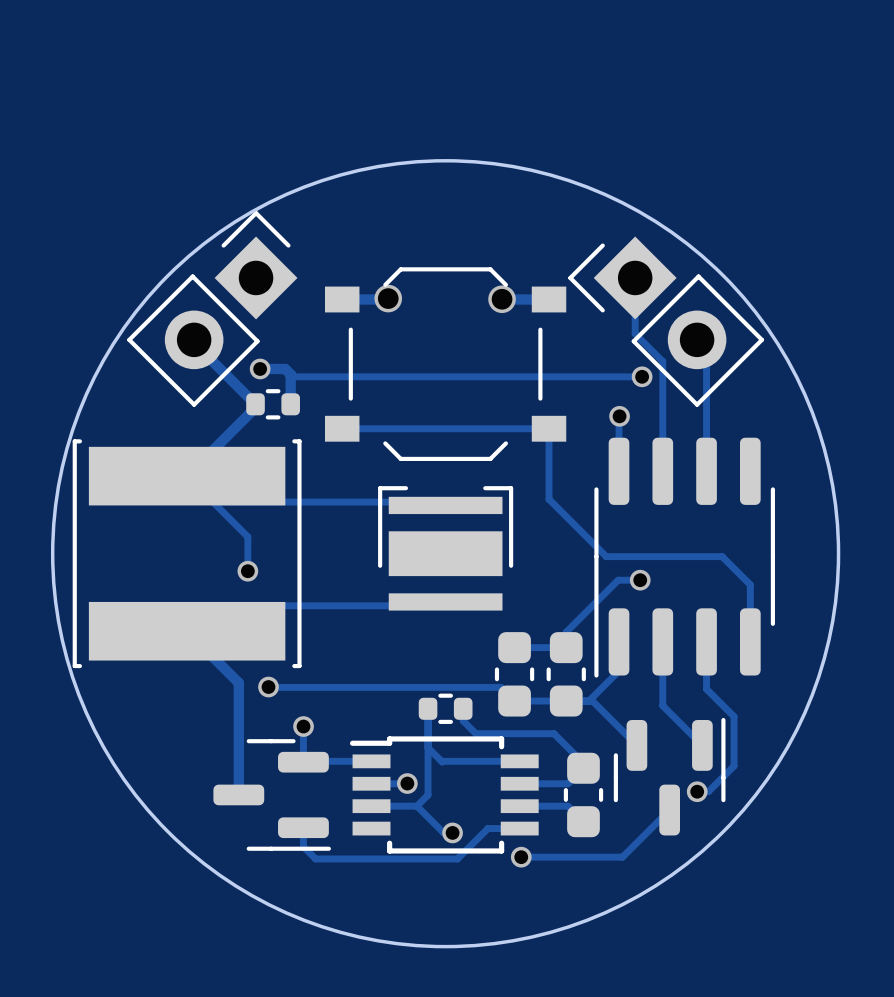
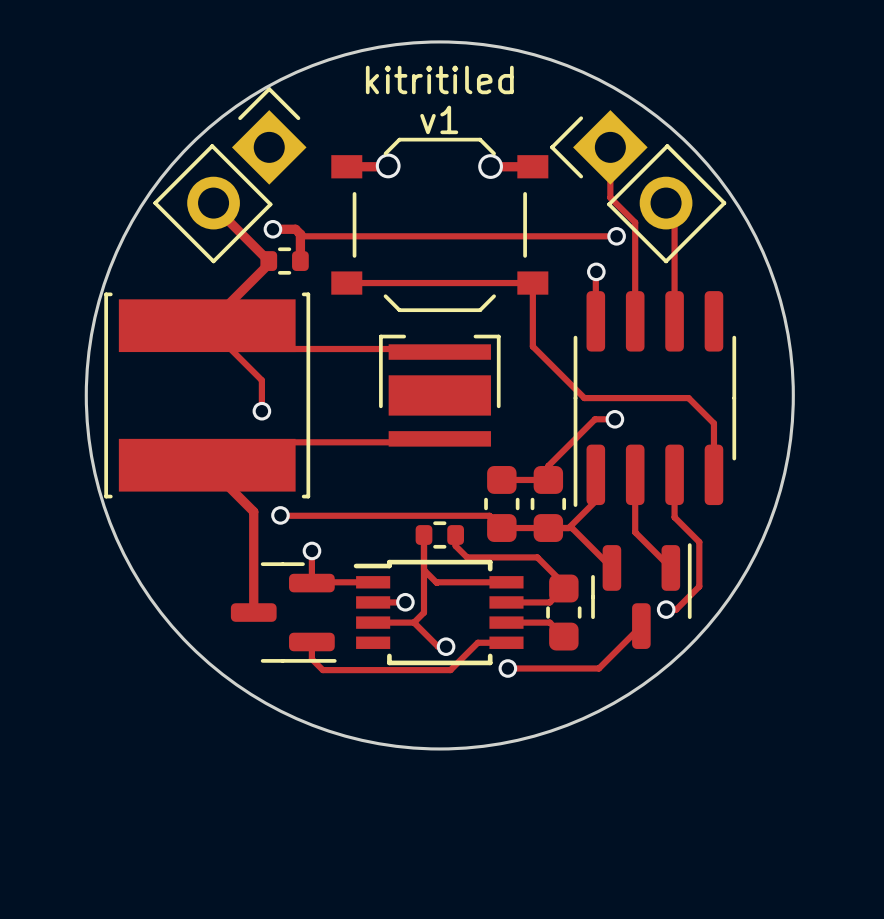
text: none -> kitritiled (439, 79)
text: none -> v1 (439, 119)

